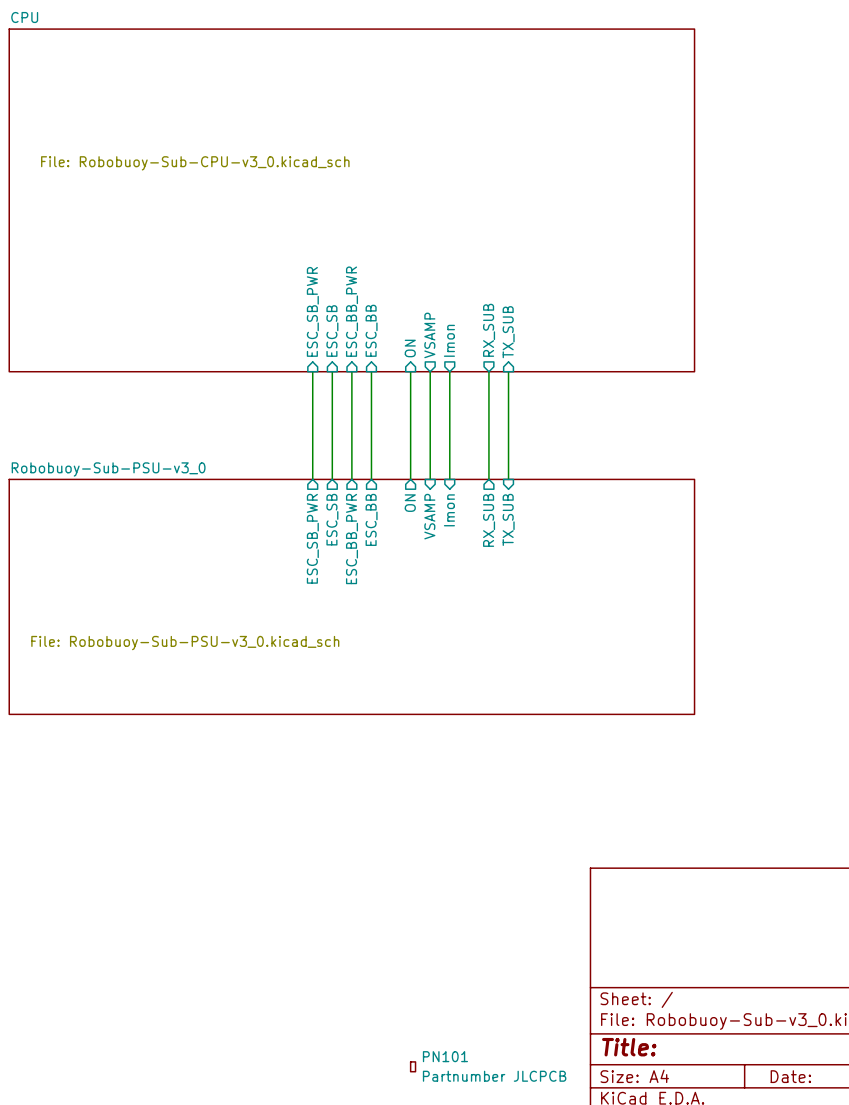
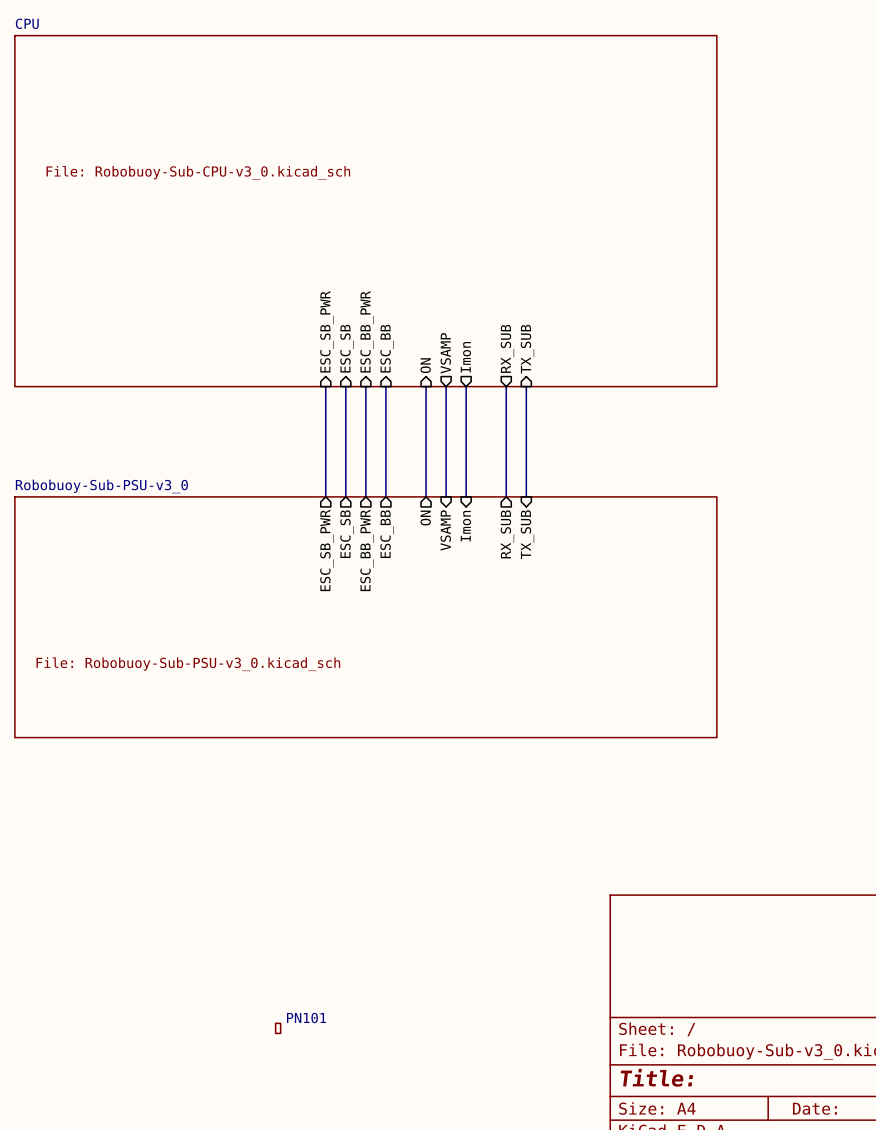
PN101 position: (413, 1066) -> (278, 1028)
PN101 value: Partnumber JLCPCB (494, 1076) -> none

